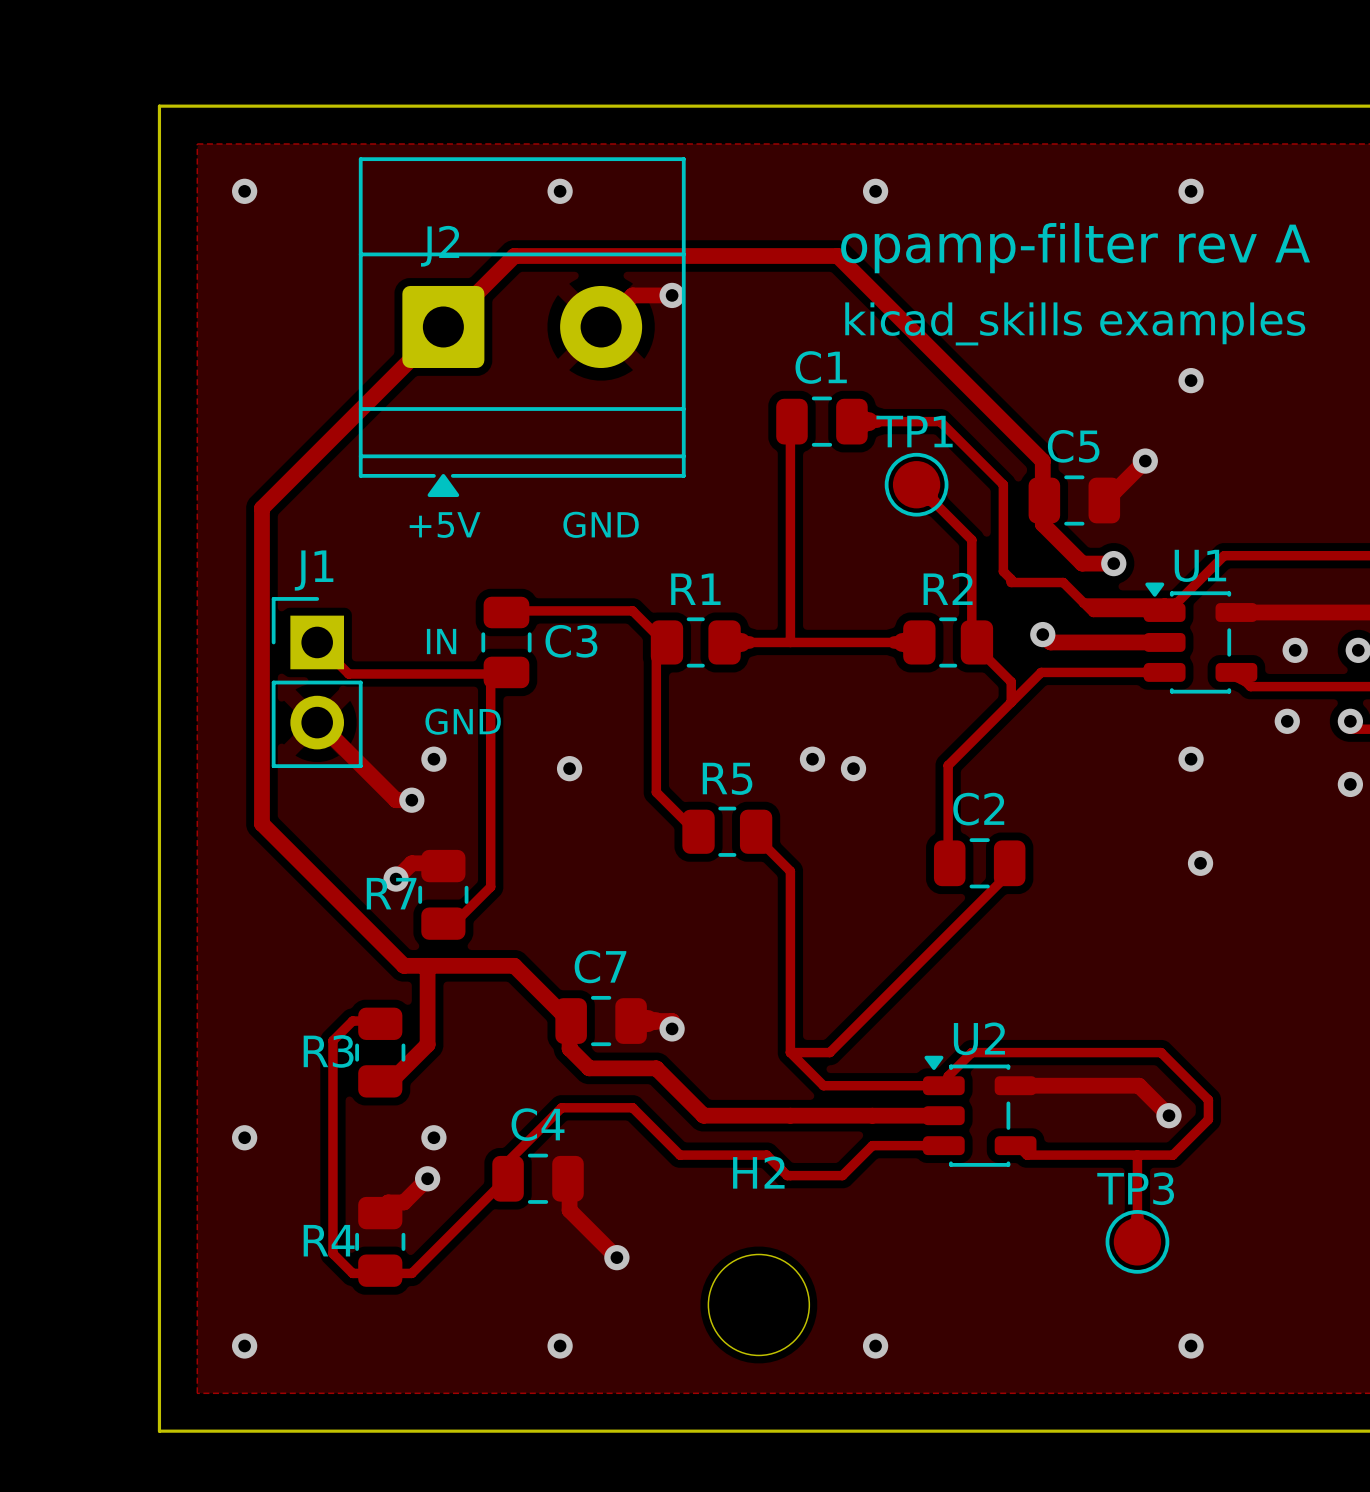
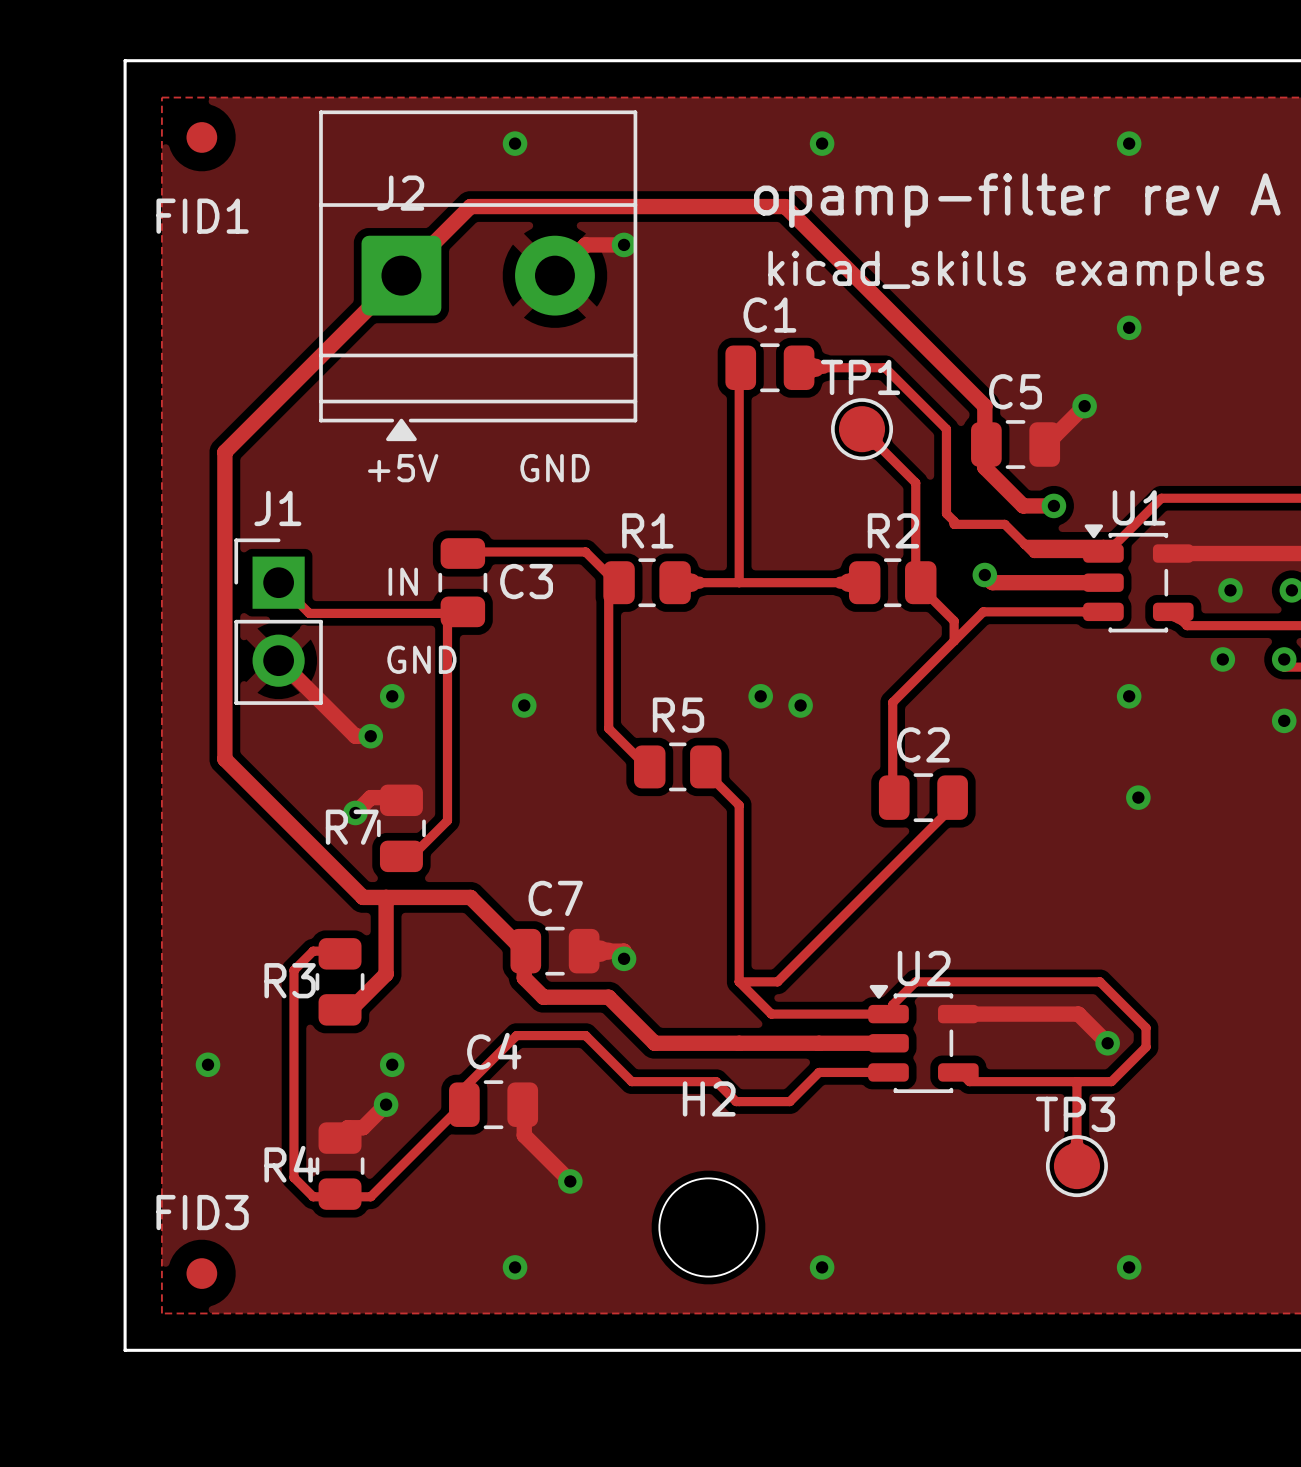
FID1: none -> (201, 137)
via: (244, 191) -> none
via: (244, 1345) -> none
FID3: none -> (201, 1273)

